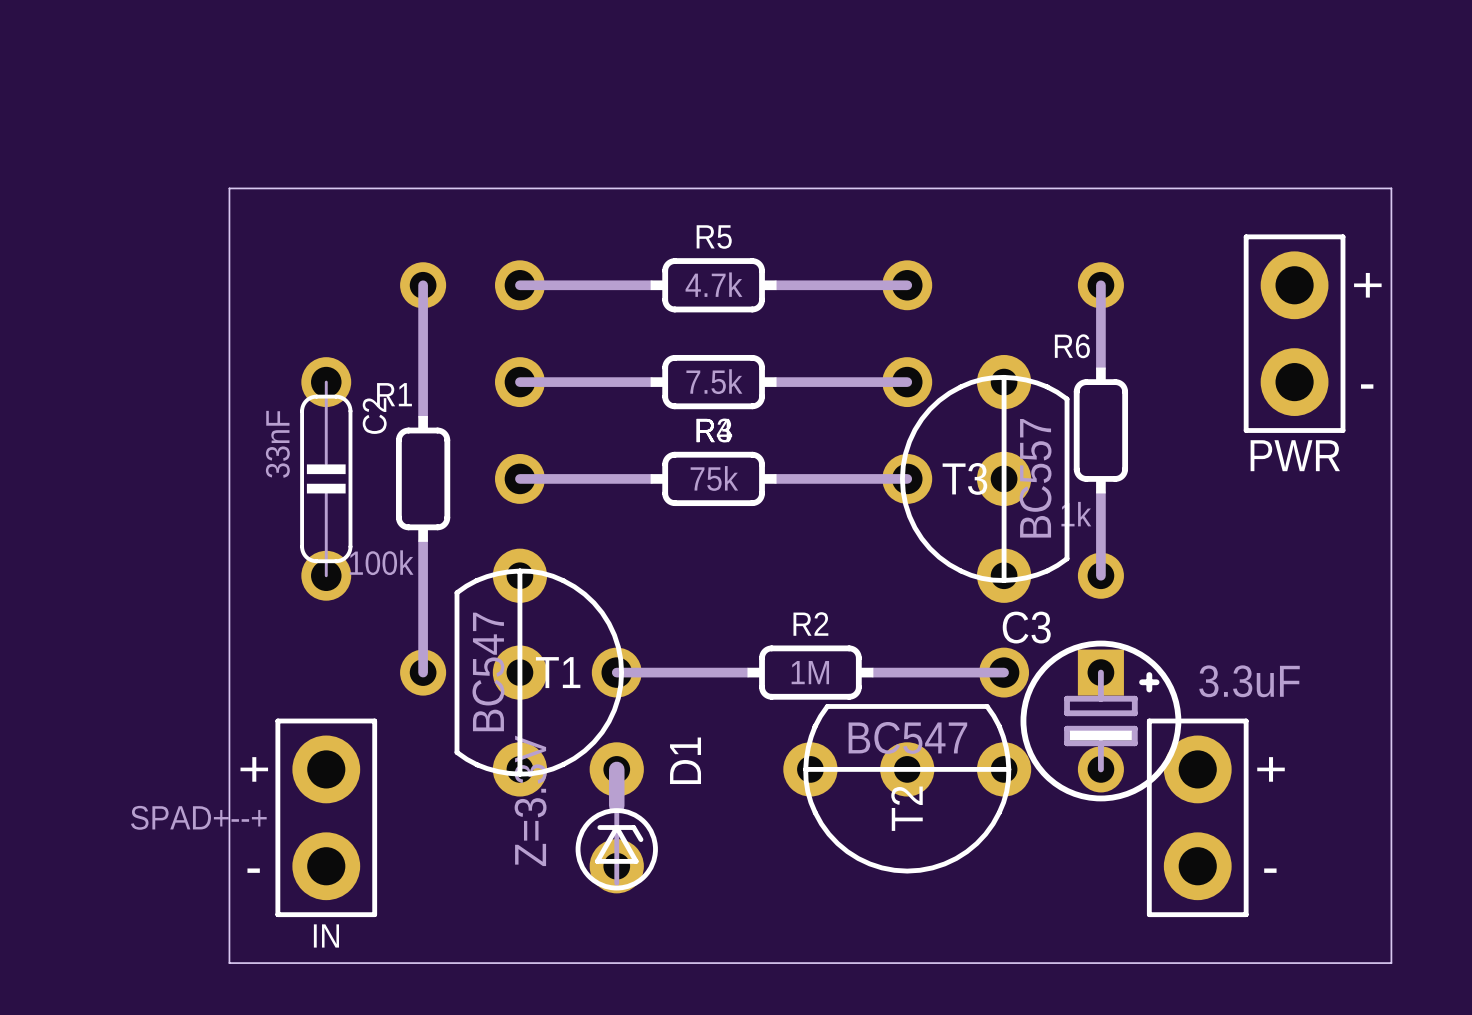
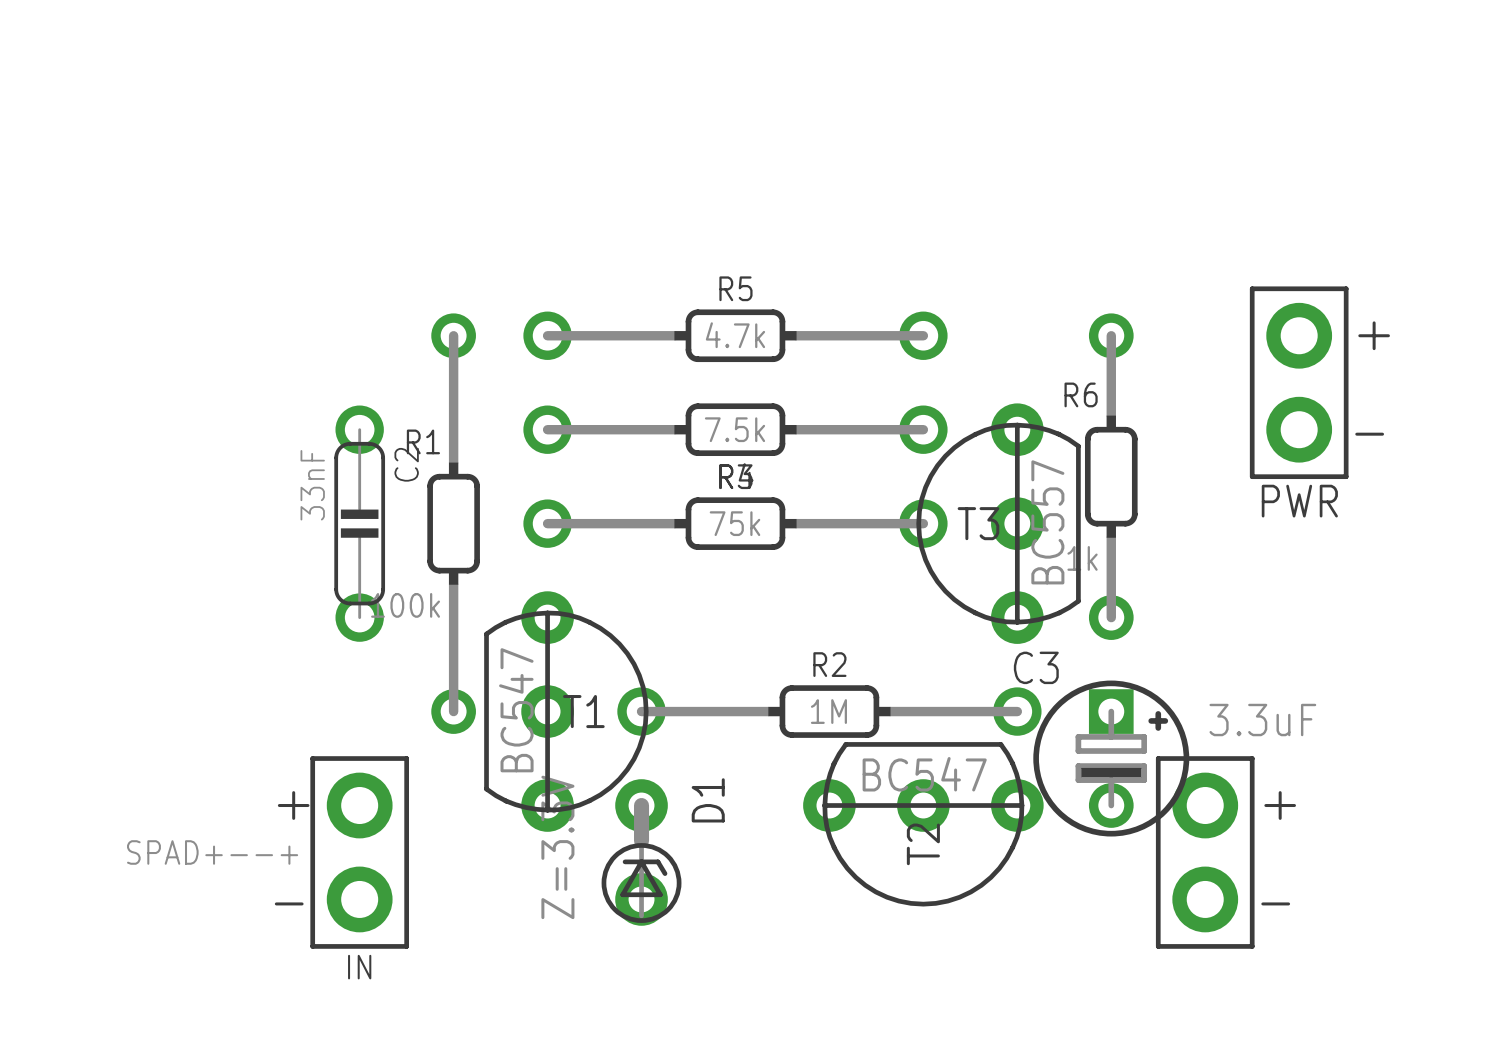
board edge: (229, 188) (1391, 188) (1391, 963) (229, 963) (229, 188) -> none

